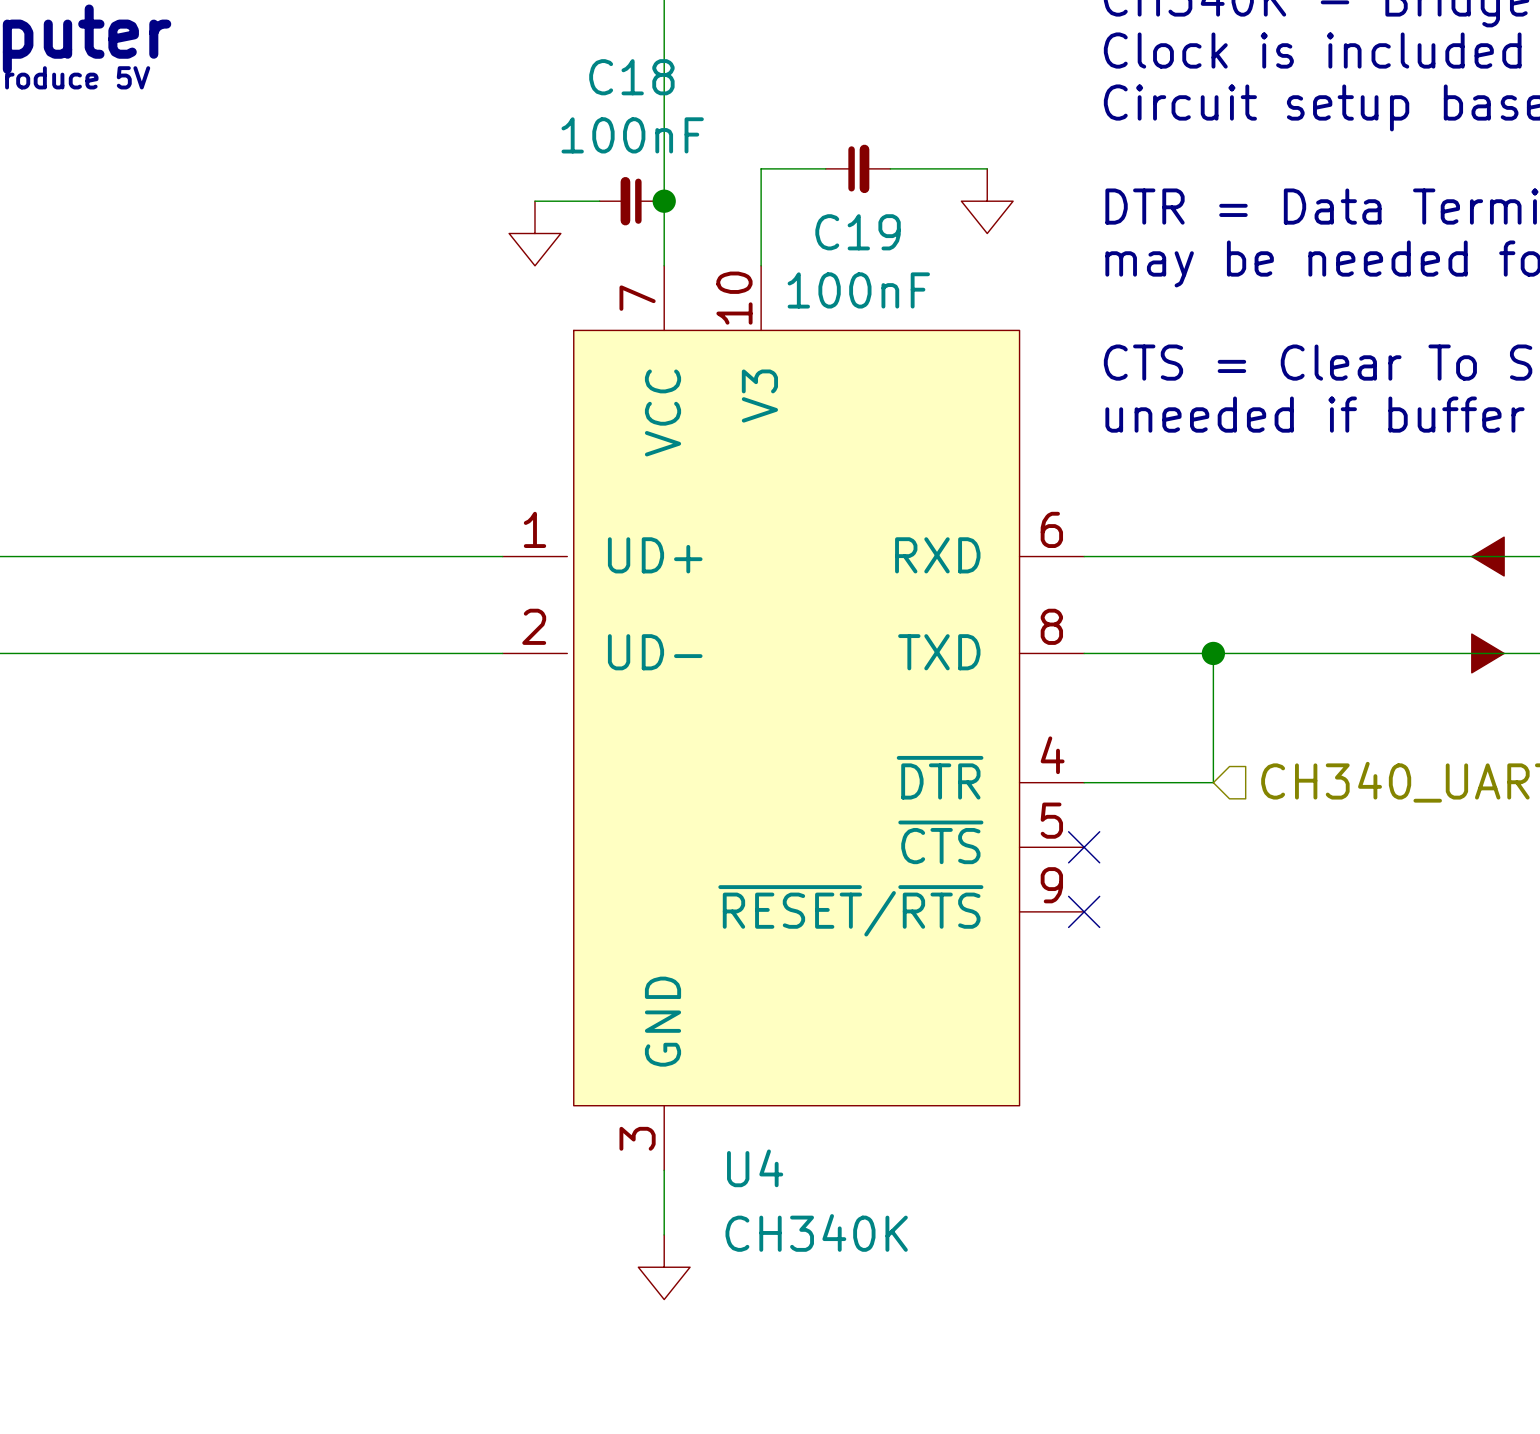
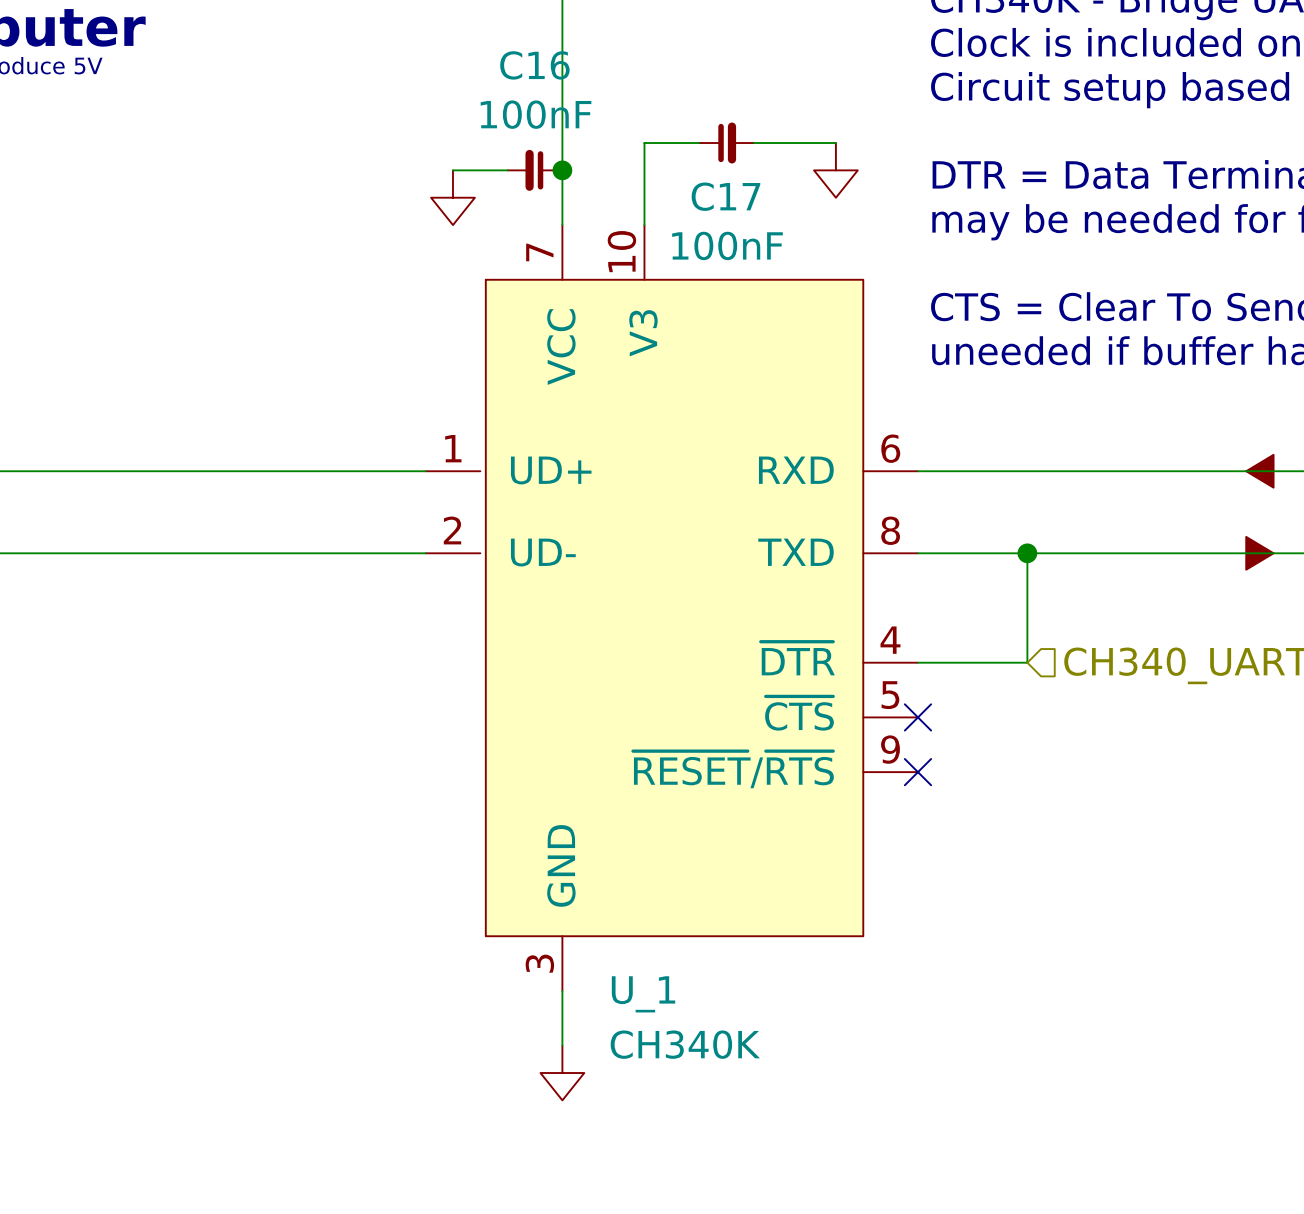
C18 name: C18 (631, 77) -> C16 (534, 65)
C19 name: C19 (858, 232) -> C17 (725, 196)
U4 name: U4 (755, 1168) -> U_1 (643, 994)

